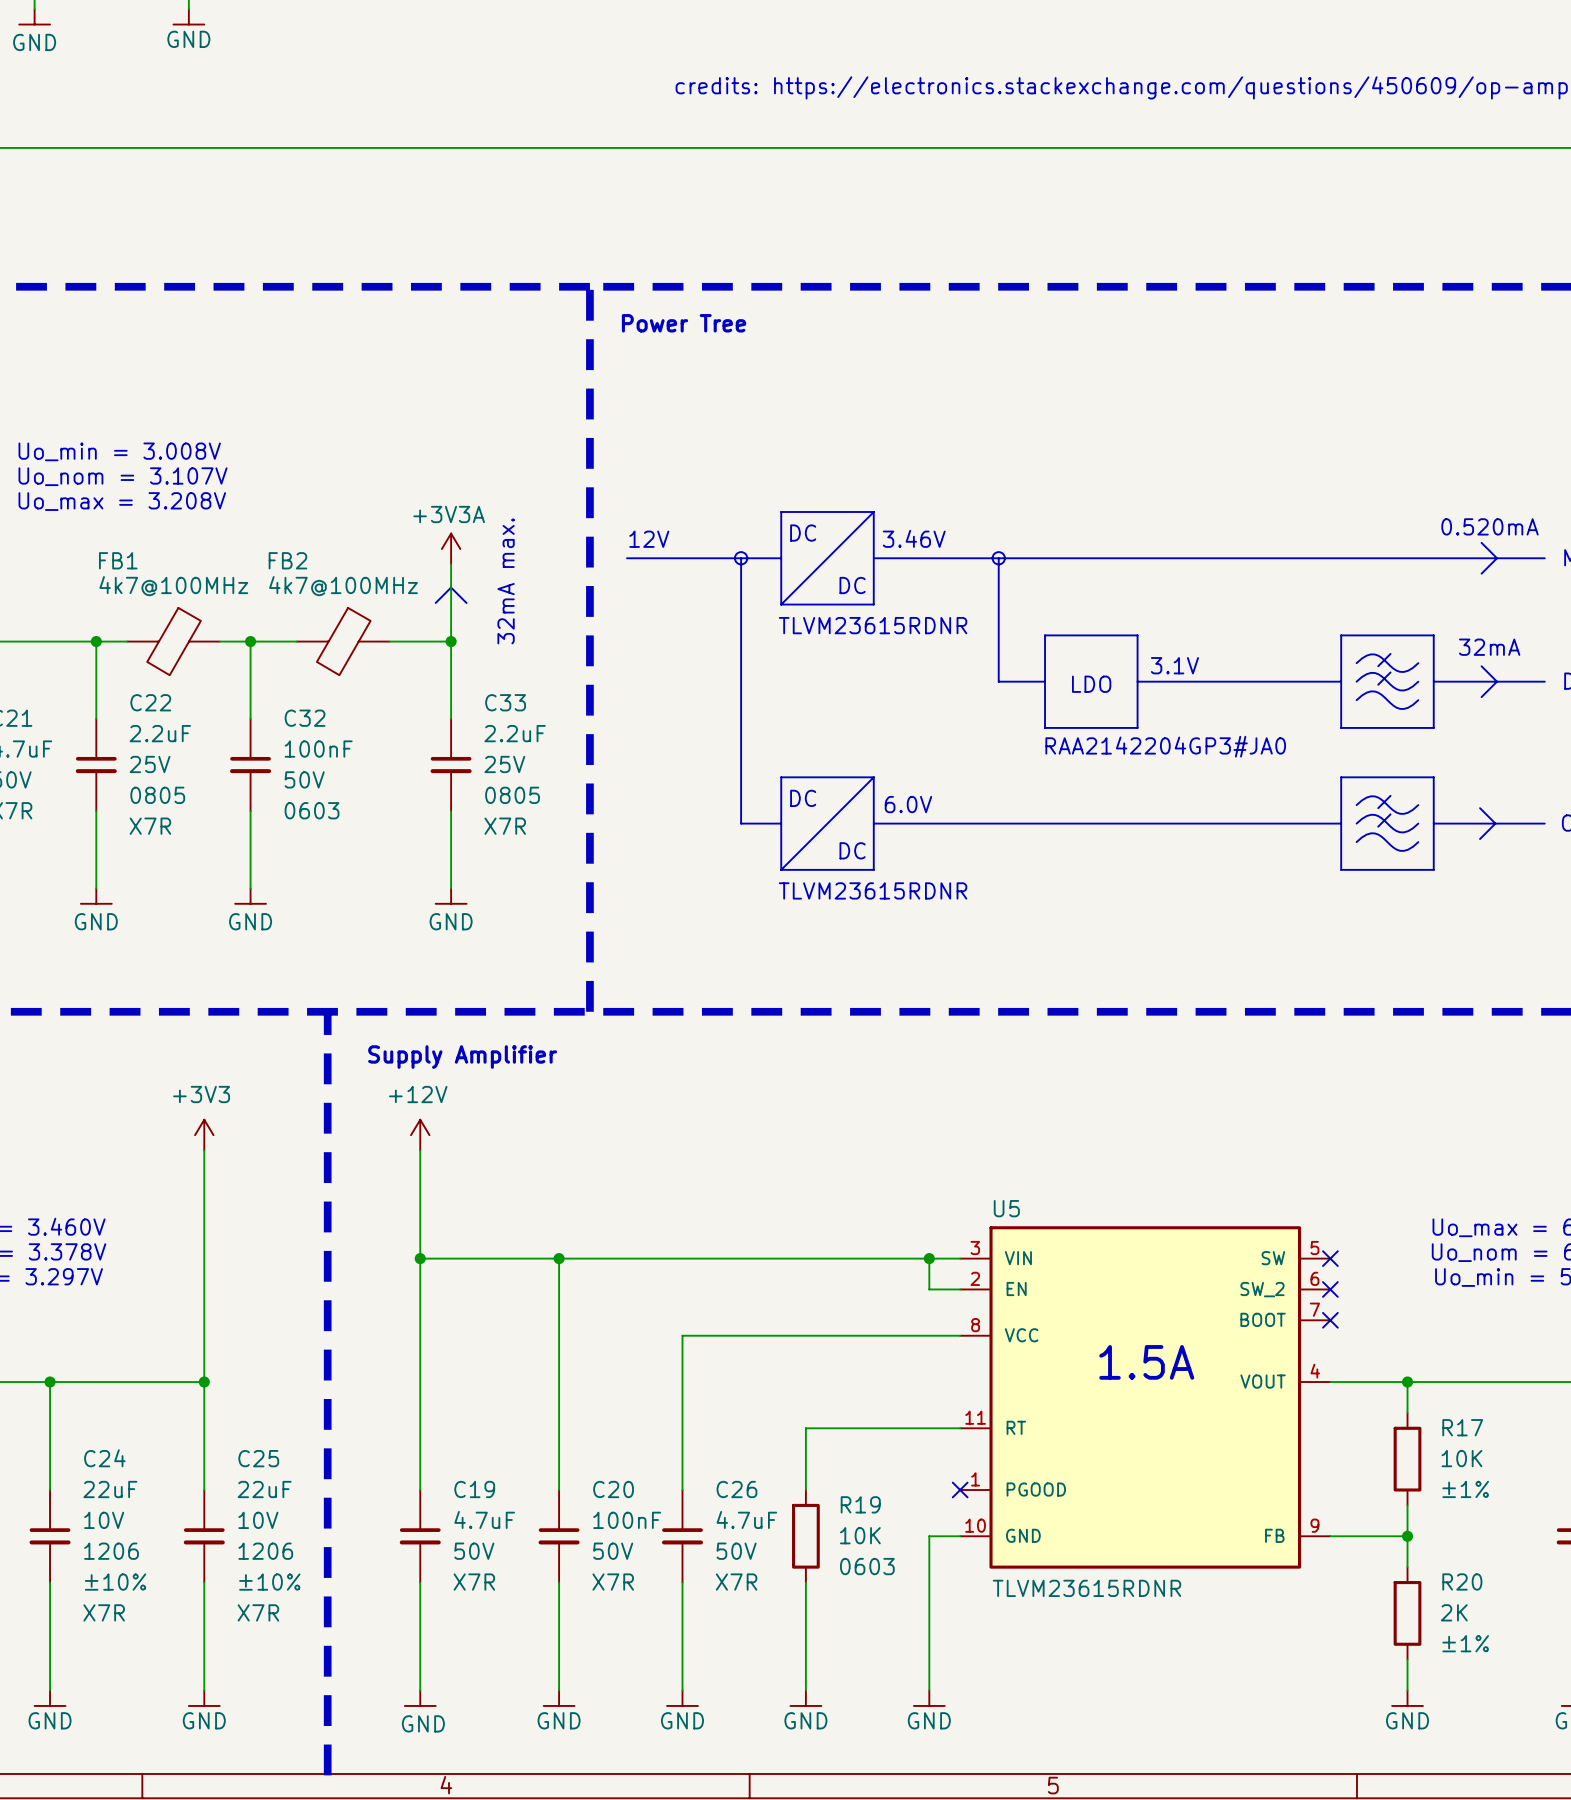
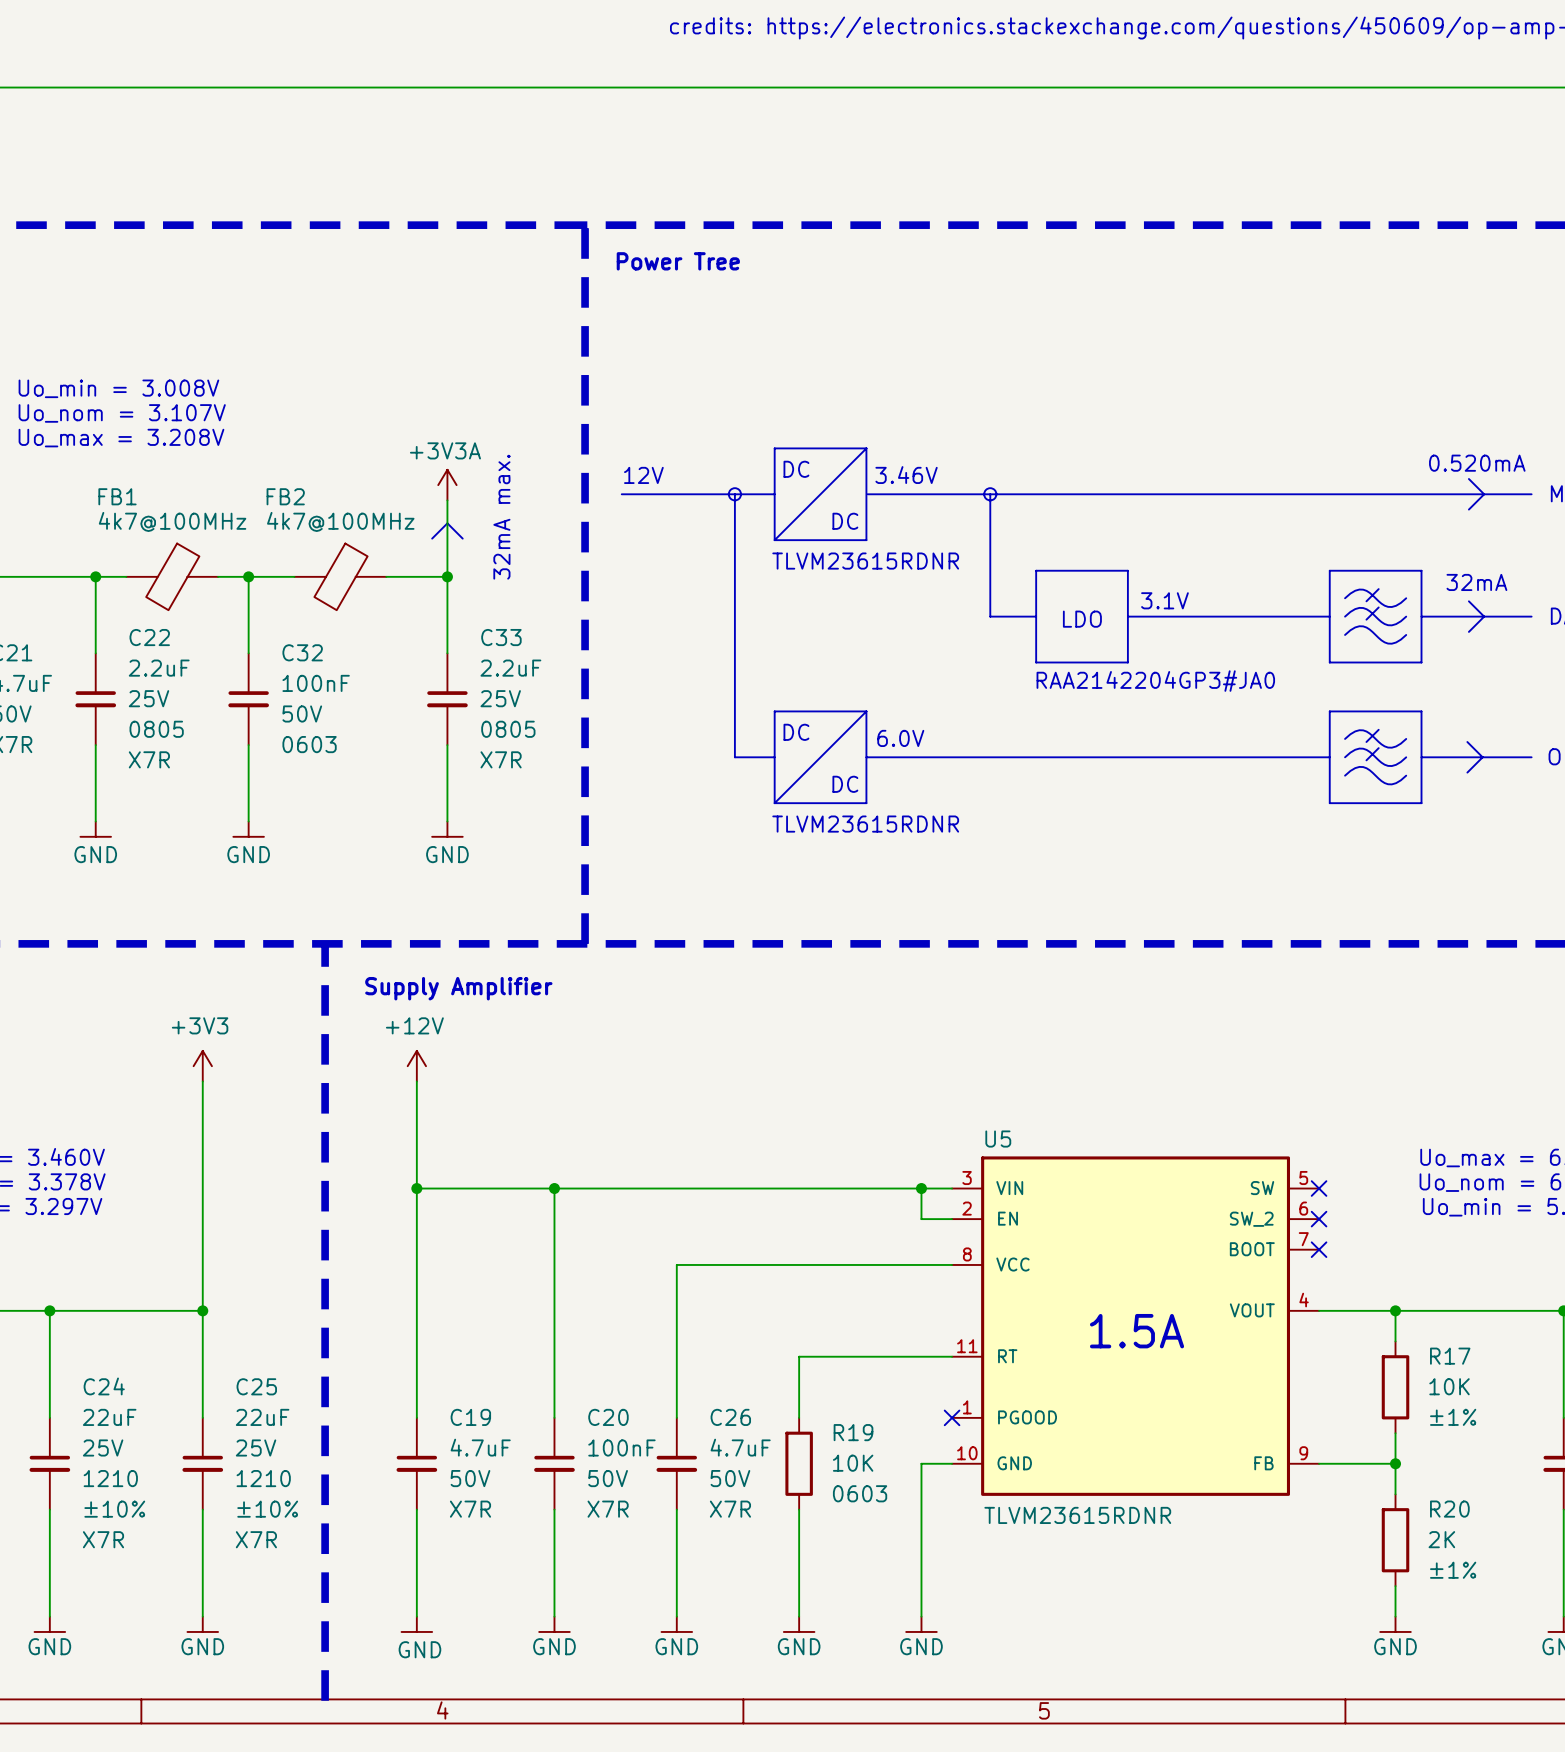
text position: 1.5A (1146, 1362) -> 1.5A (1137, 1331)
C24 text: 10V (104, 1520) -> 25V (103, 1447)
C25 text: 10V (258, 1520) -> 25V (256, 1447)
C24 text: 1206 (111, 1551) -> 1210 (110, 1478)
C25 text: 1206 (265, 1551) -> 1210 (263, 1478)

